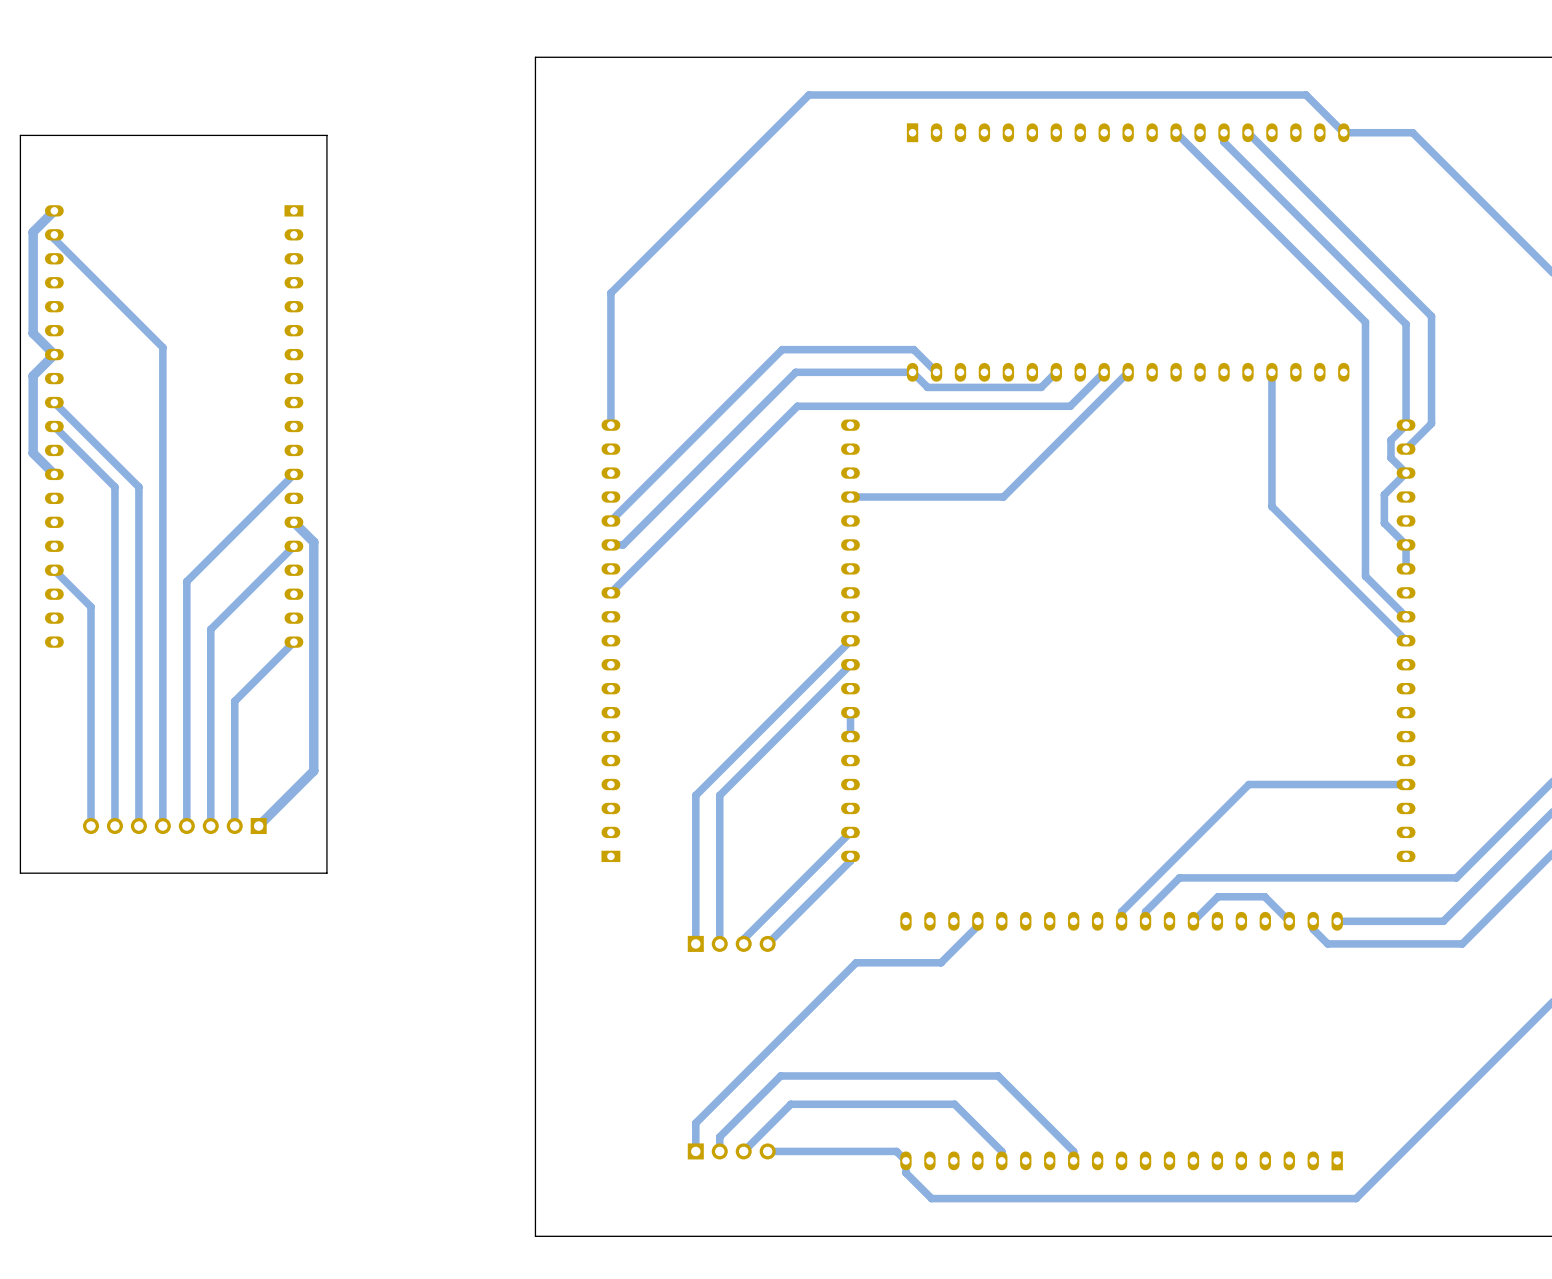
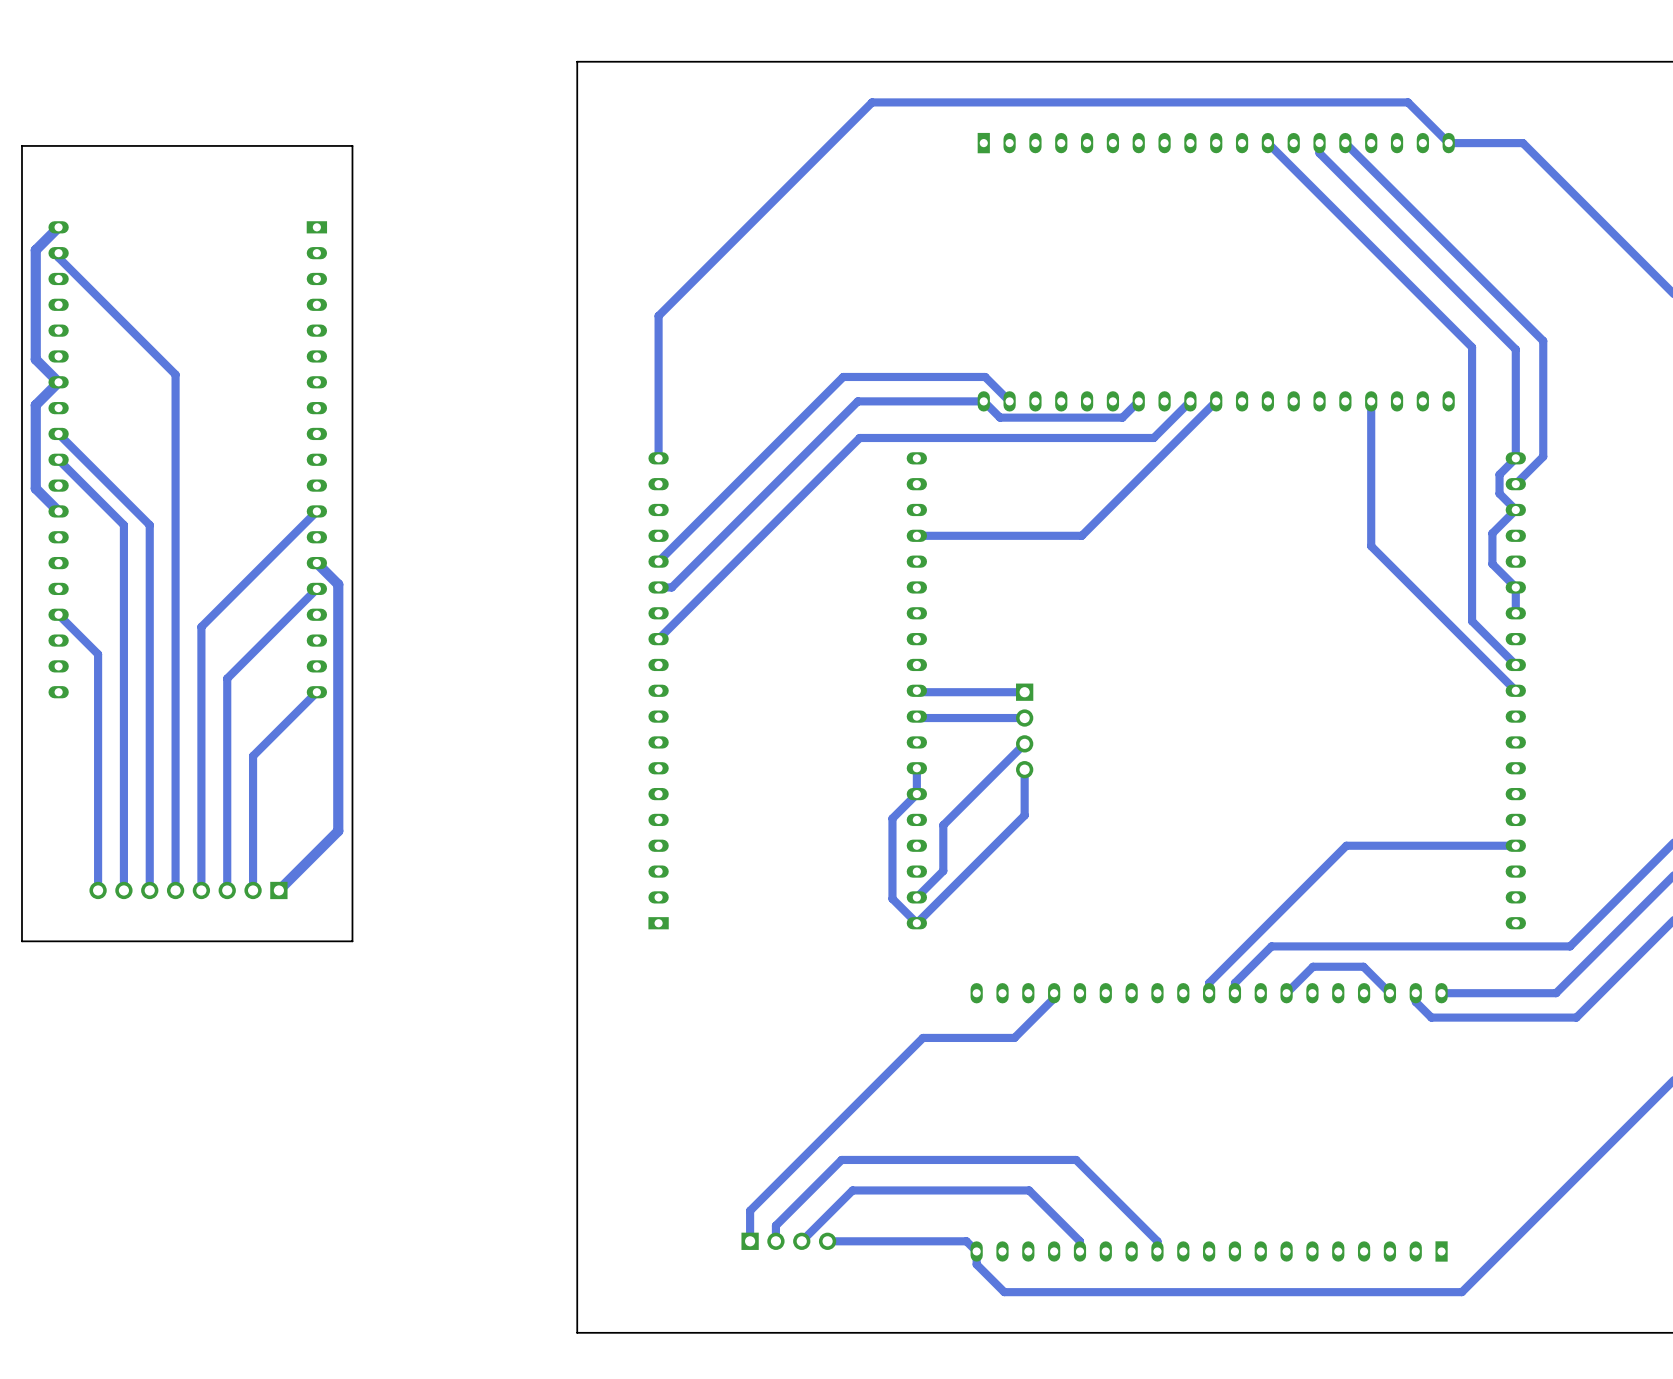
track: (850, 640) (695, 795) (695, 943) -> none
track: none -> (1024, 692) (918, 692)
track: (850, 664) (719, 795) (719, 943) -> none
track: none -> (1024, 718) (918, 718)
part: none -> (1024, 730)
track: none -> (1024, 769) (1024, 815) (916, 923) (892, 898) (892, 818) (916, 794)
track: (850, 832) (743, 939) (743, 943) -> (916, 897) (943, 870) (943, 825) (1024, 743)
track: (850, 856) (850, 861) (767, 943) -> none
part: (731, 943) -> none

